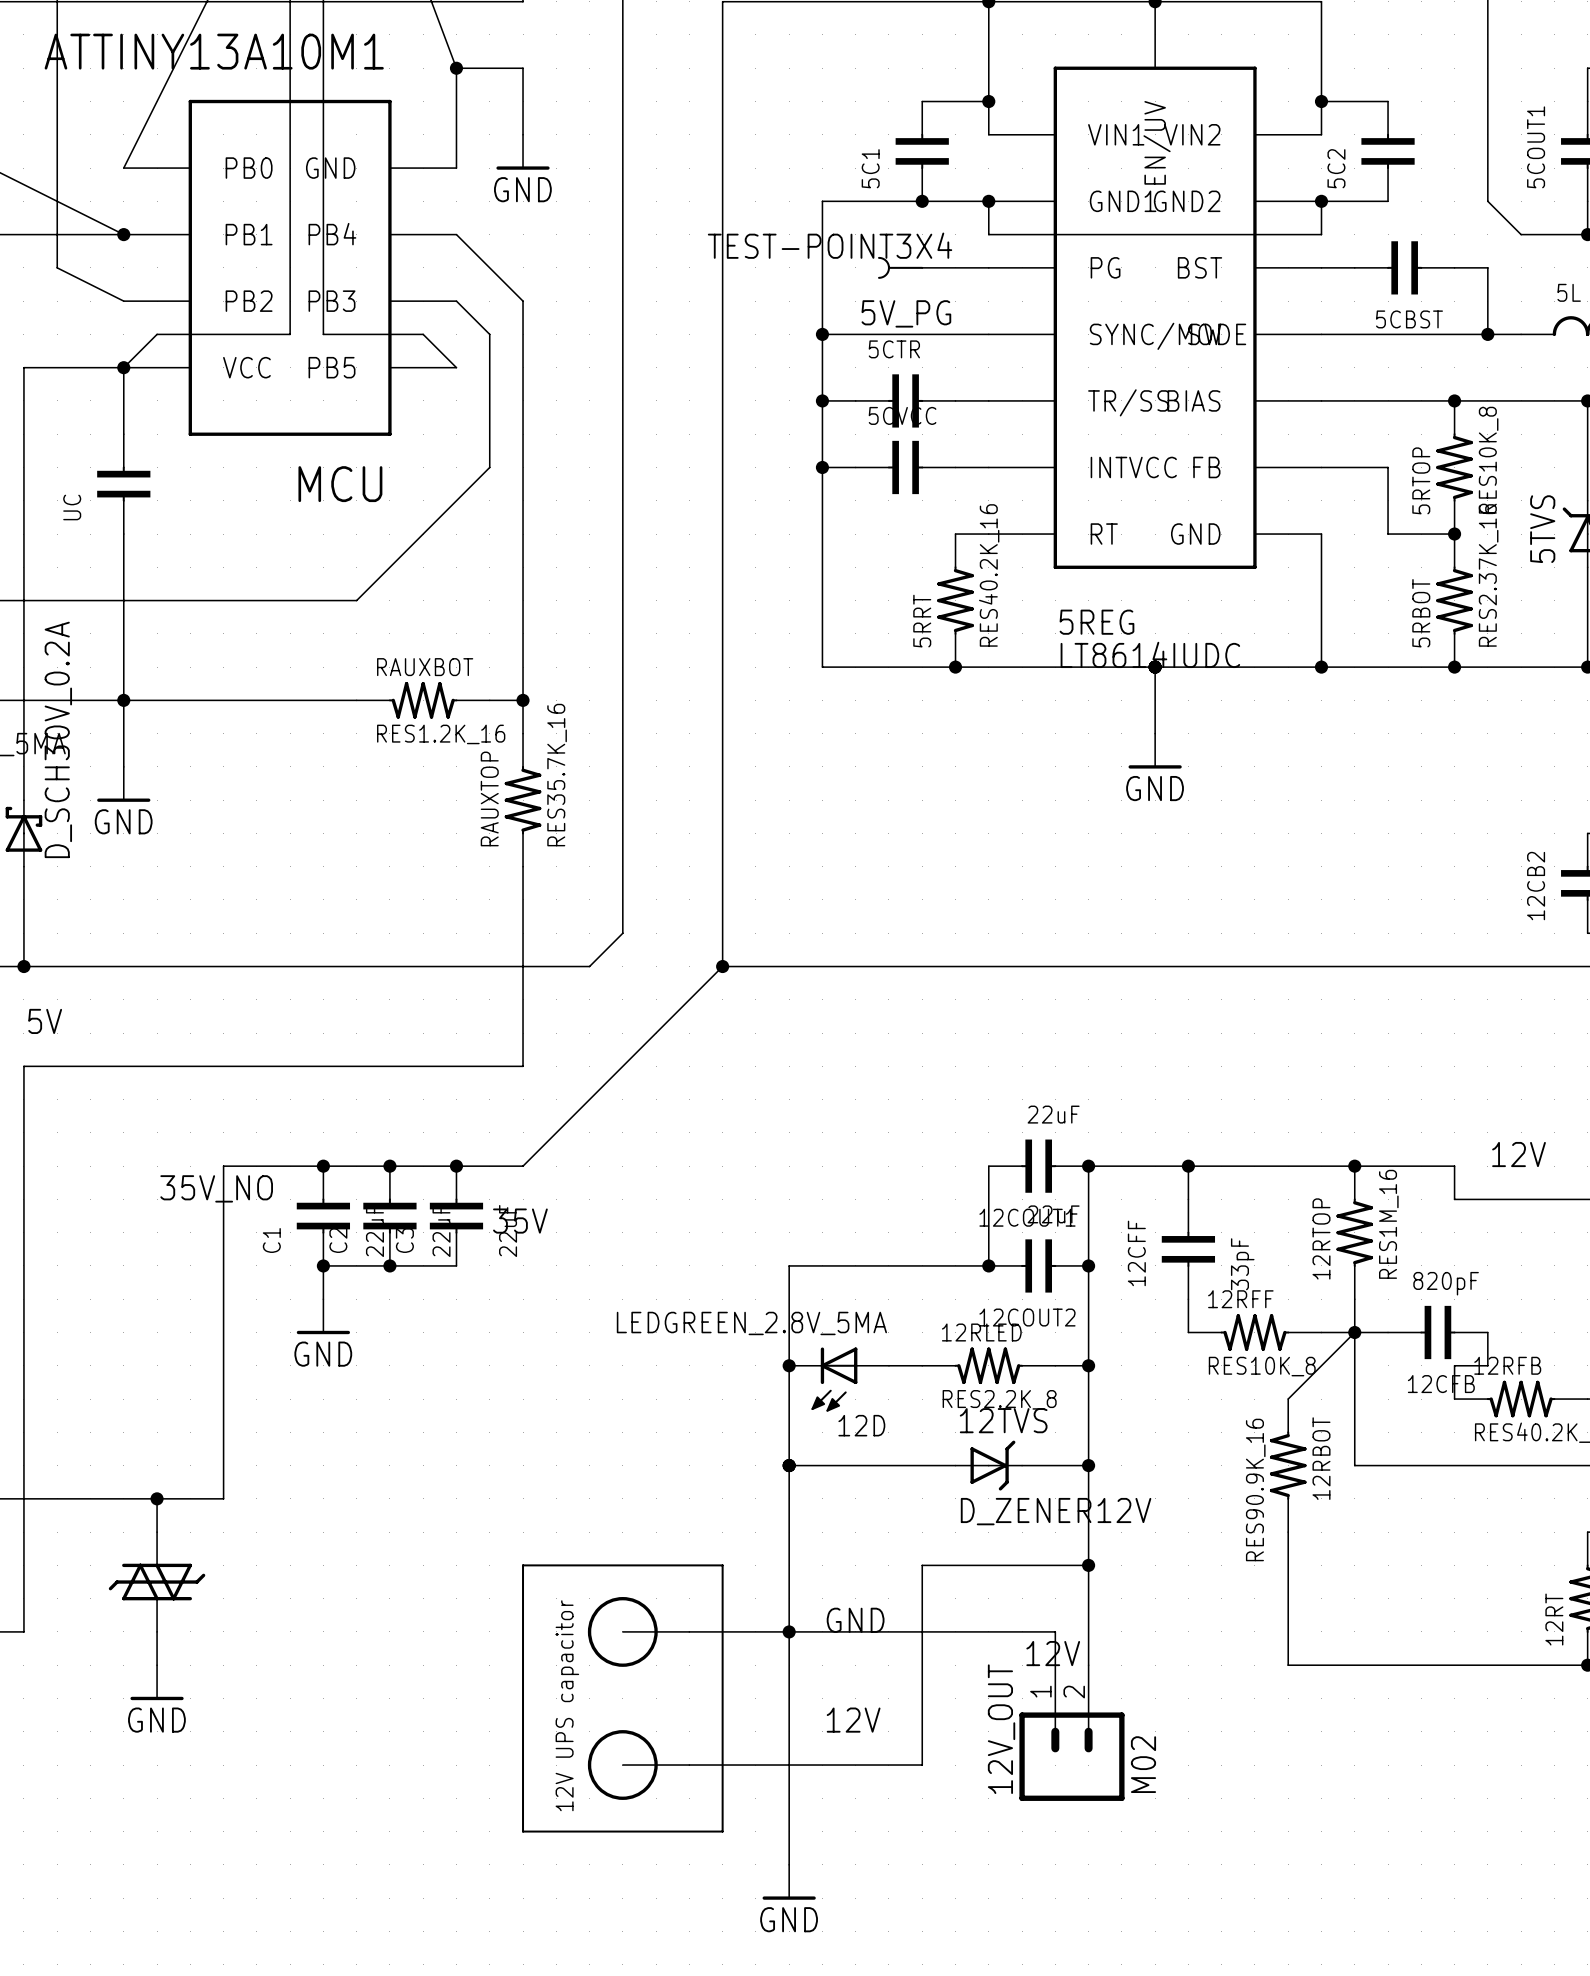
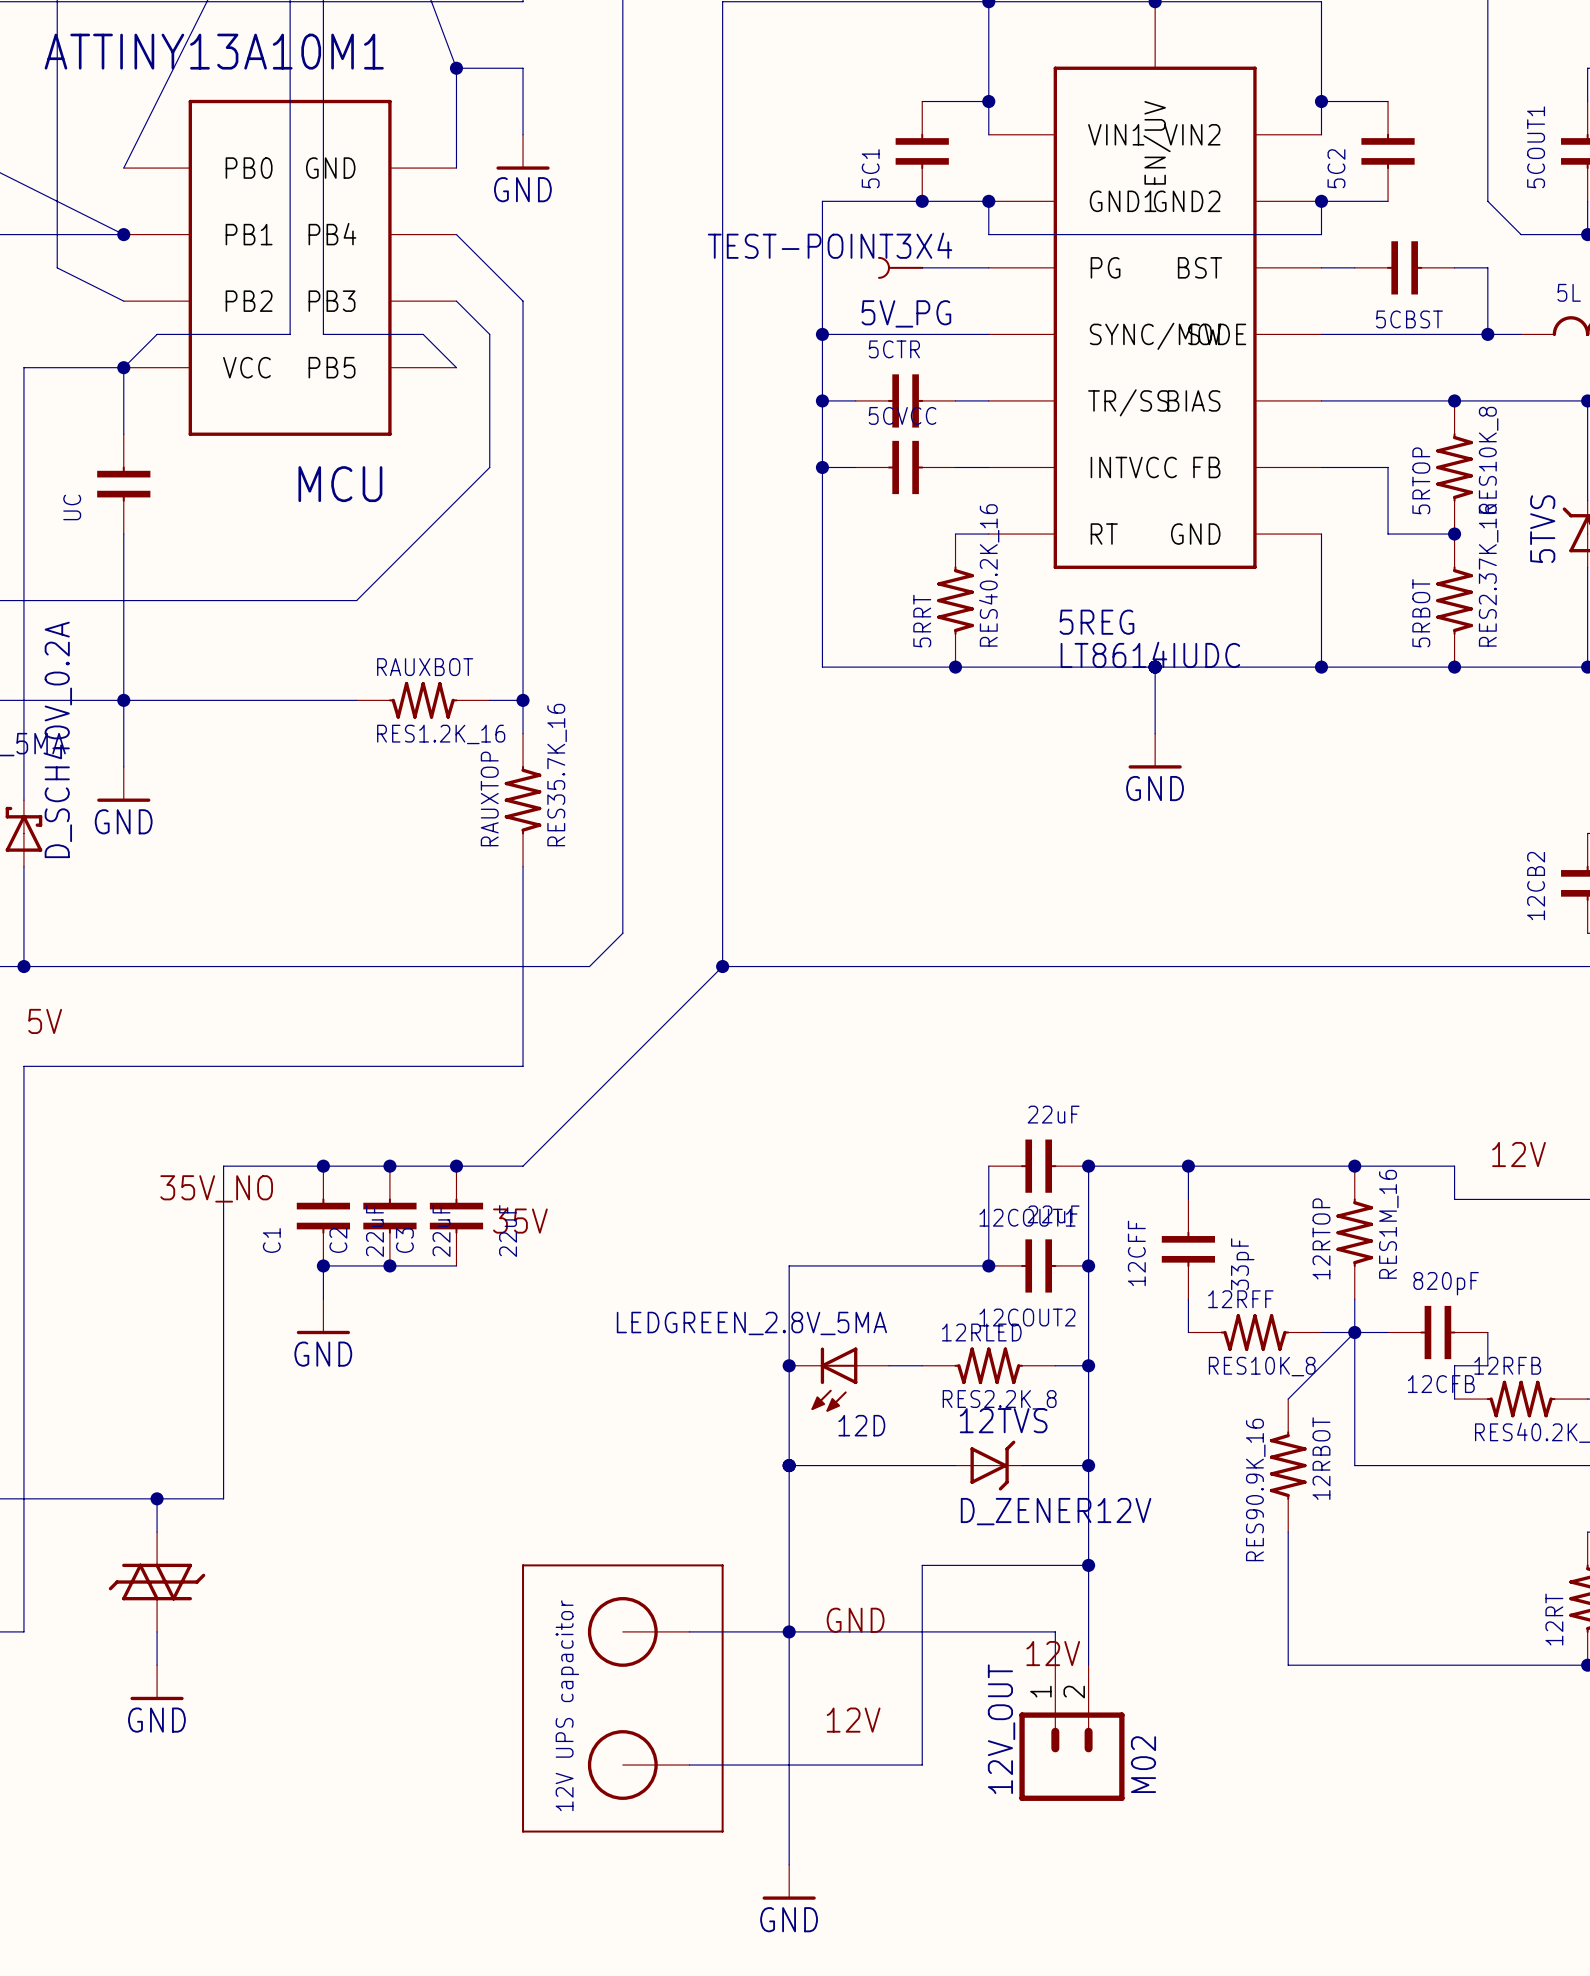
part value: D_SCH30V_0.2A (58, 739) -> D_SCH40V_0.2A (57, 739)

